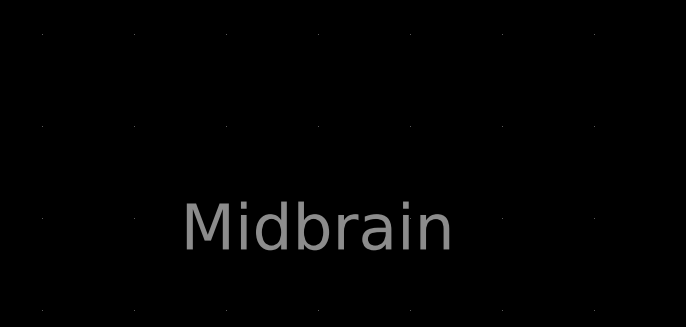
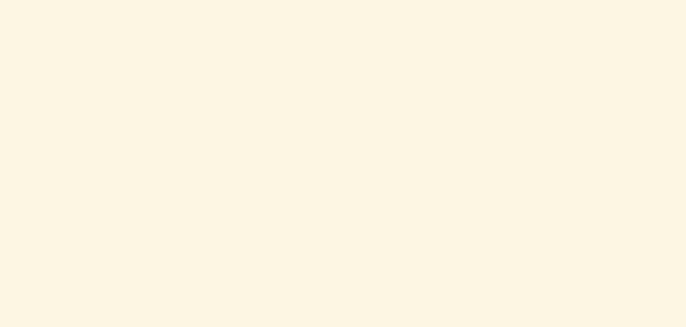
text: Midbrain (318, 225) -> none

